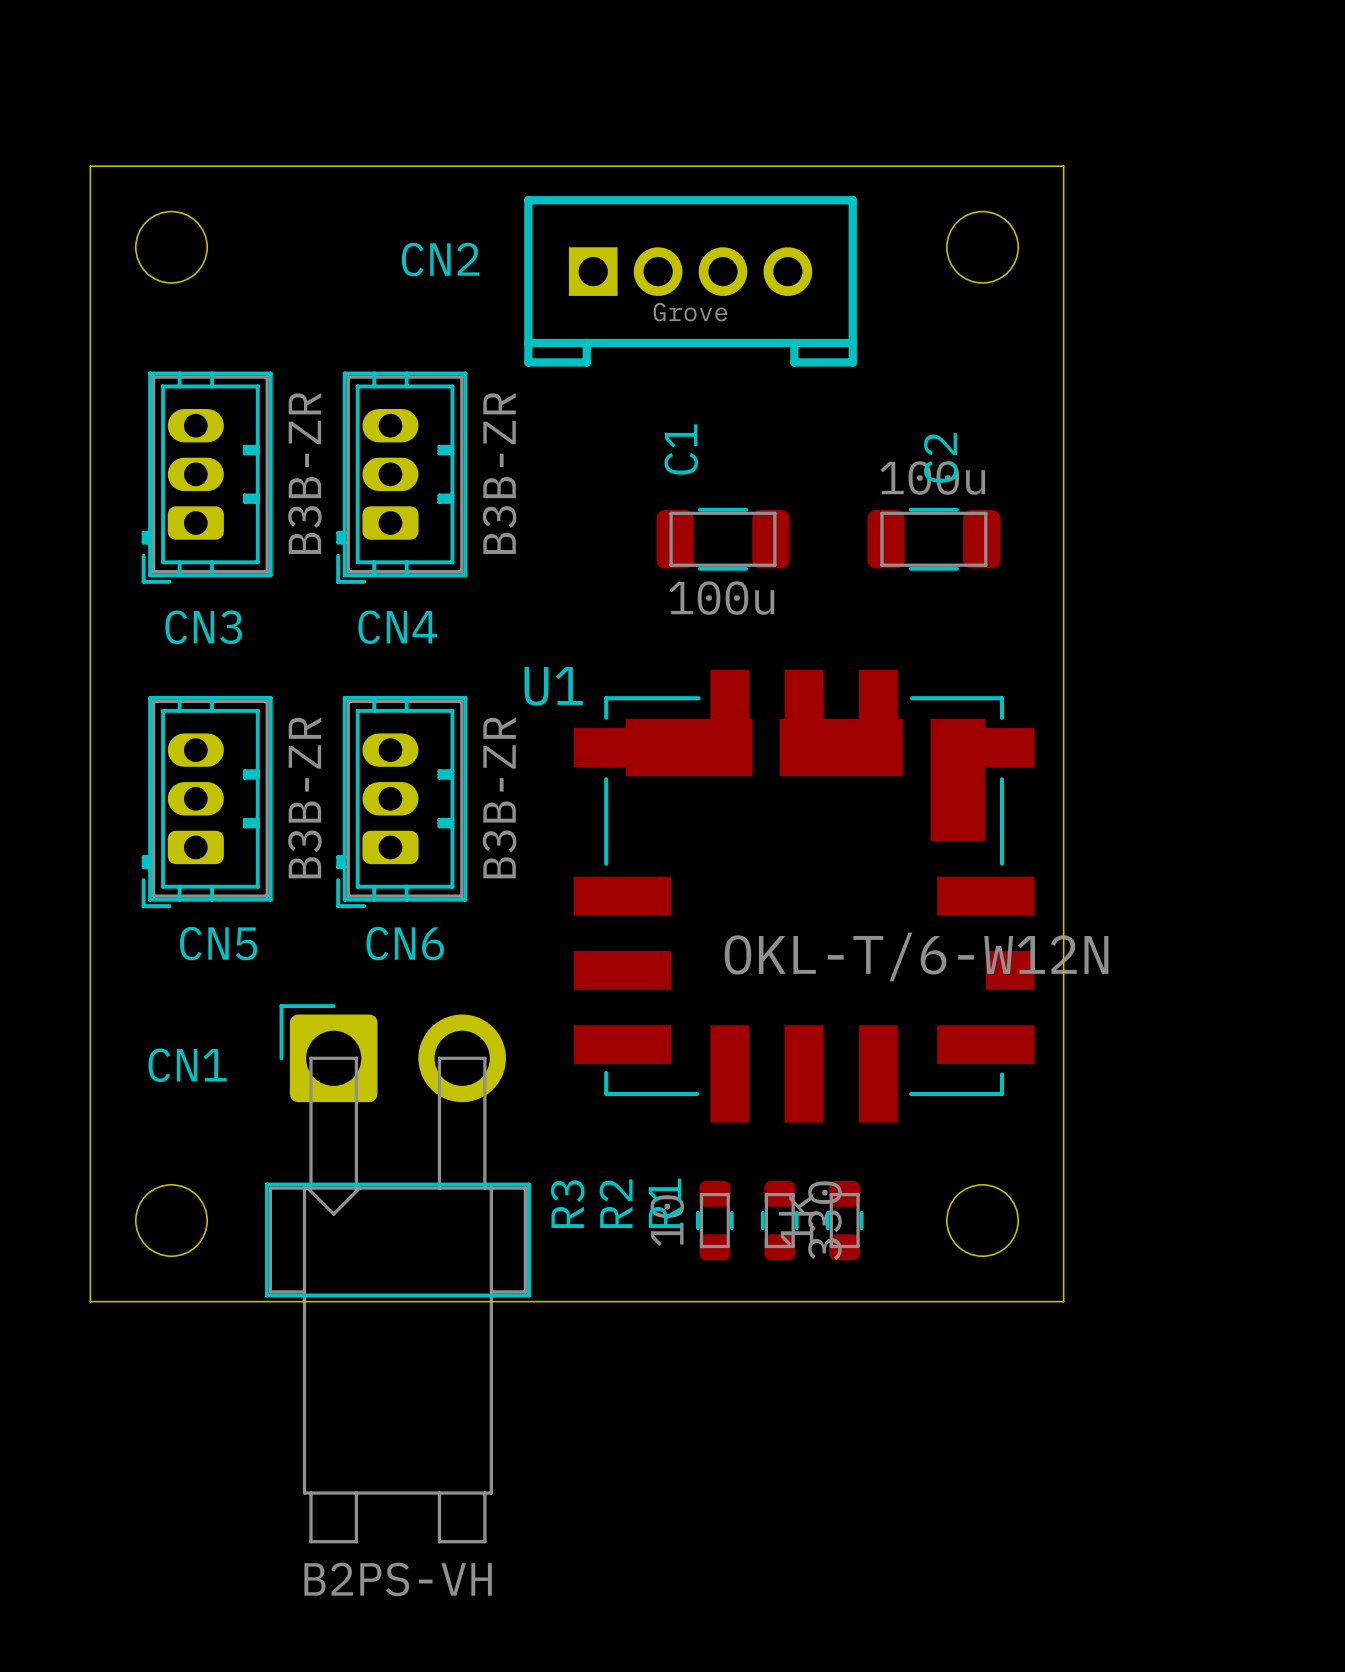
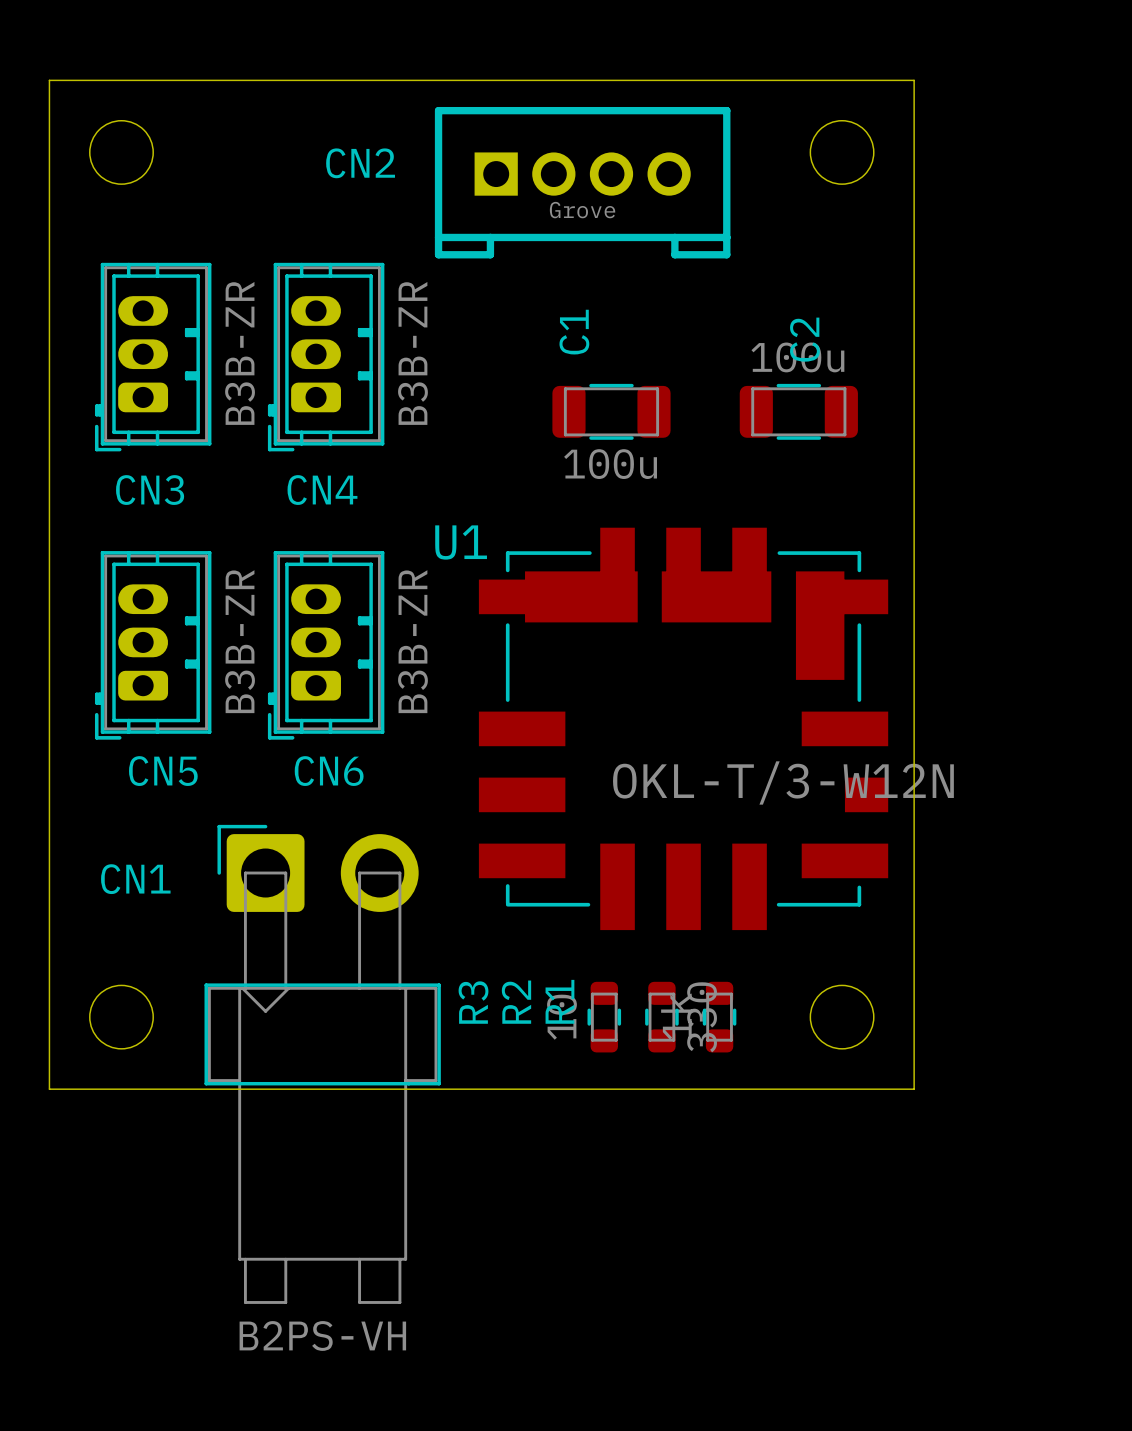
U1 value: OKL-T/6-W12N (916, 956) -> OKL-T/3-W12N (783, 782)

